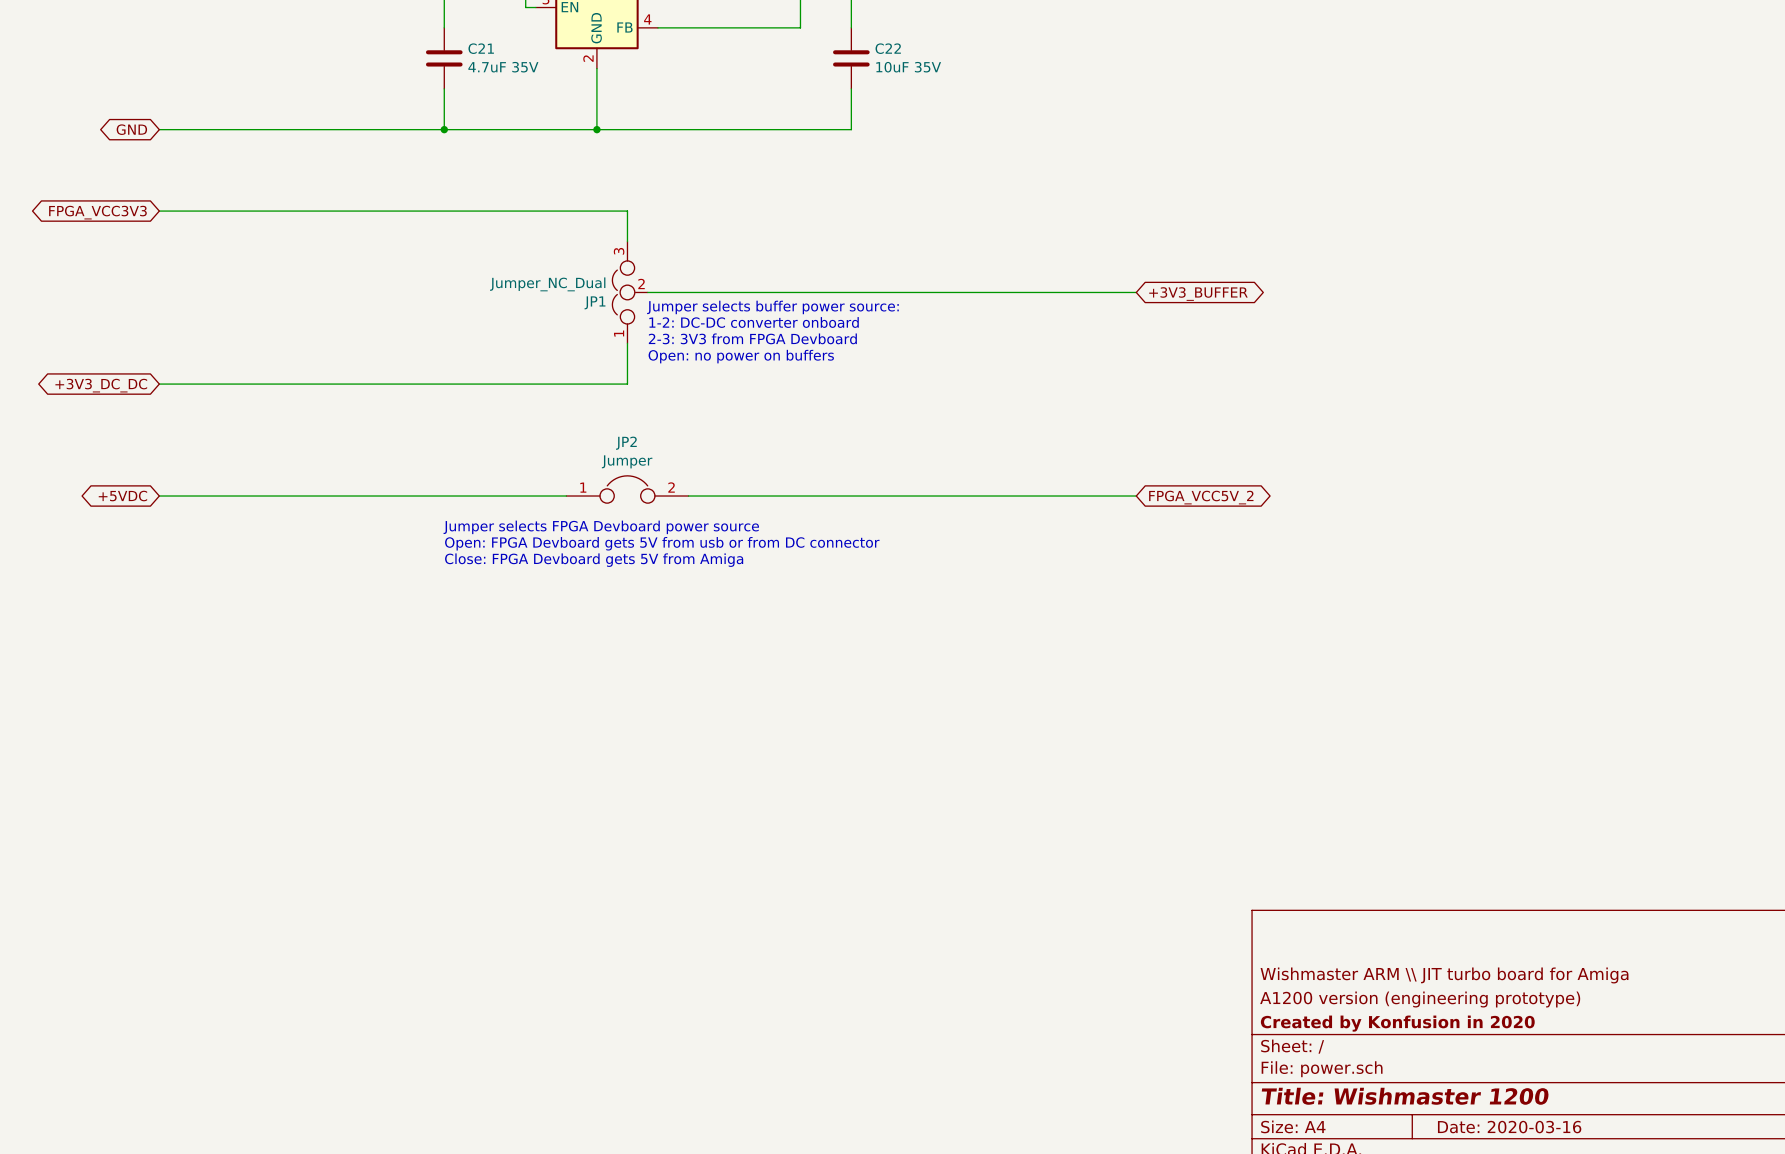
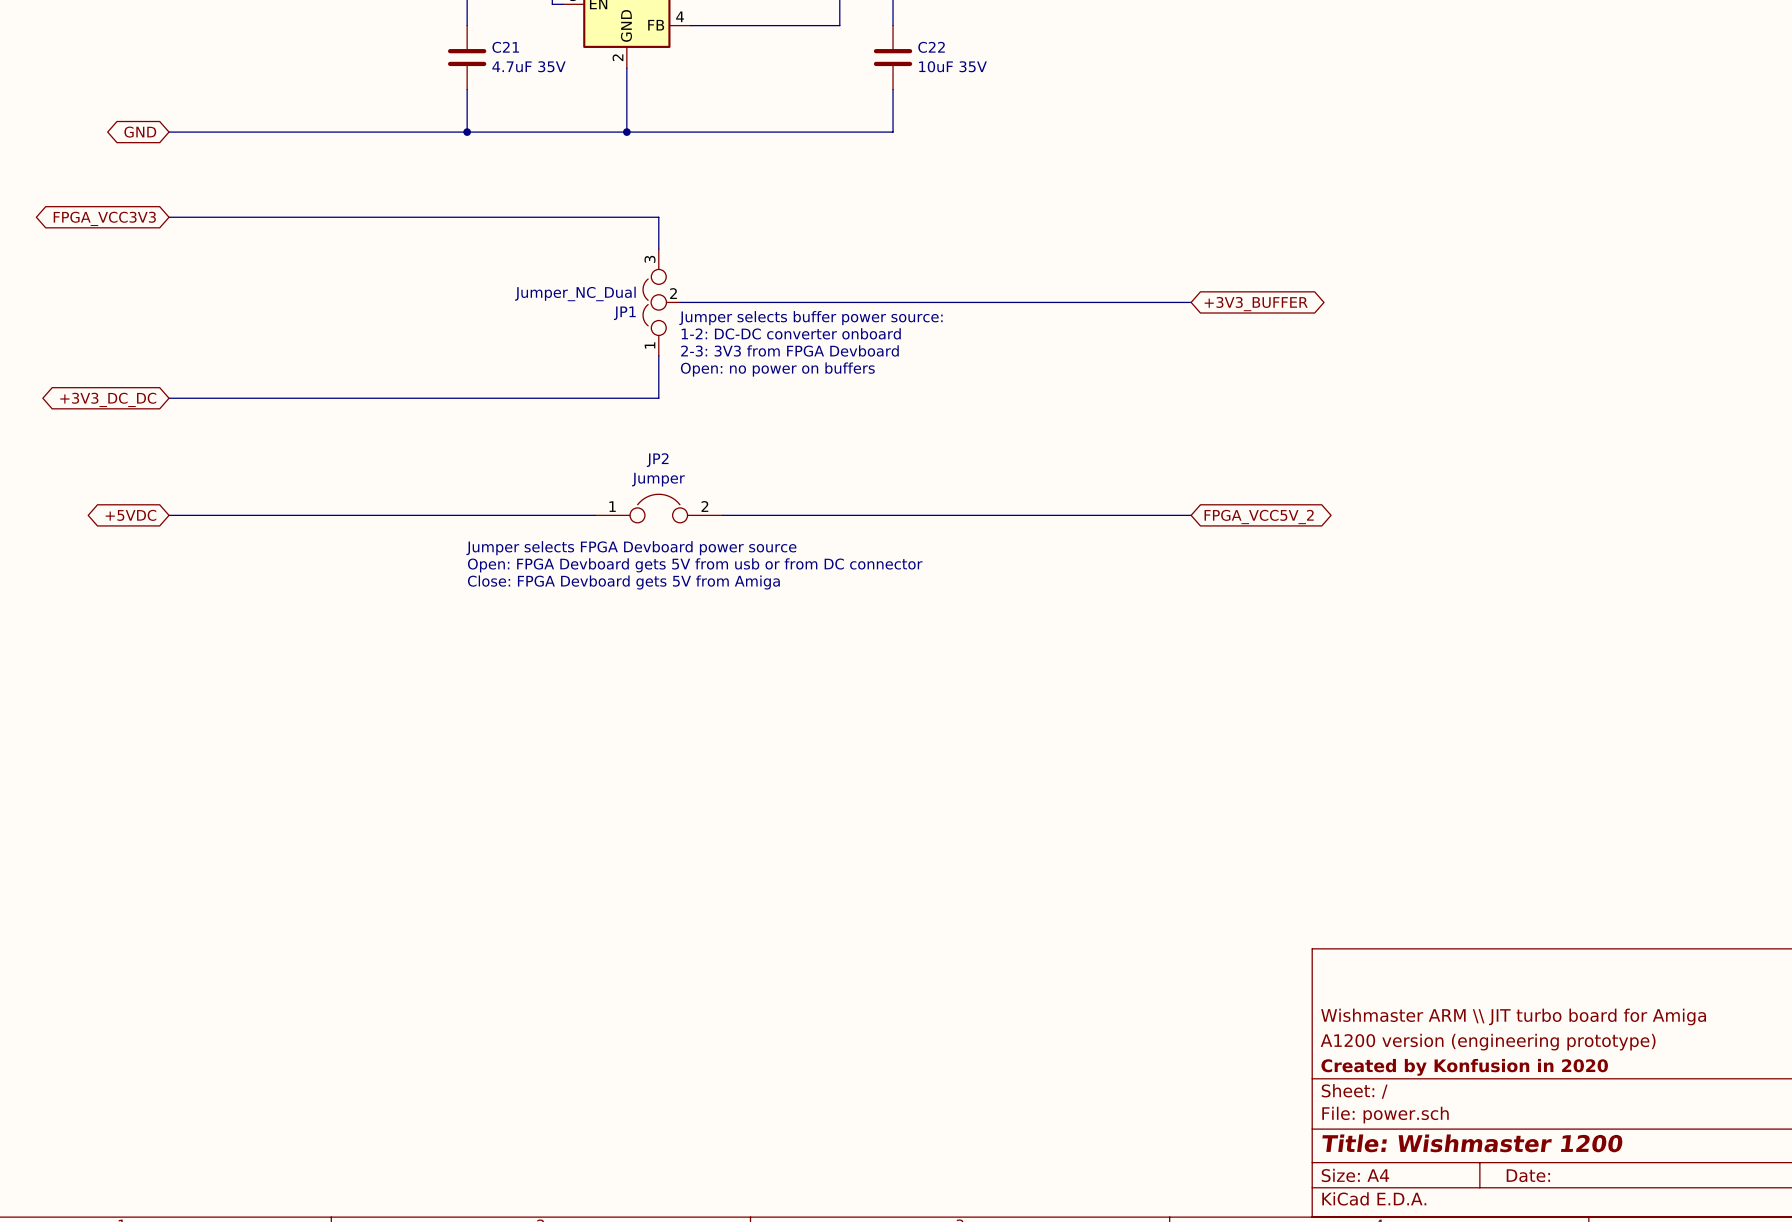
title block: Date: 2020-03-16 (1509, 1127) -> Date: (1528, 1175)

